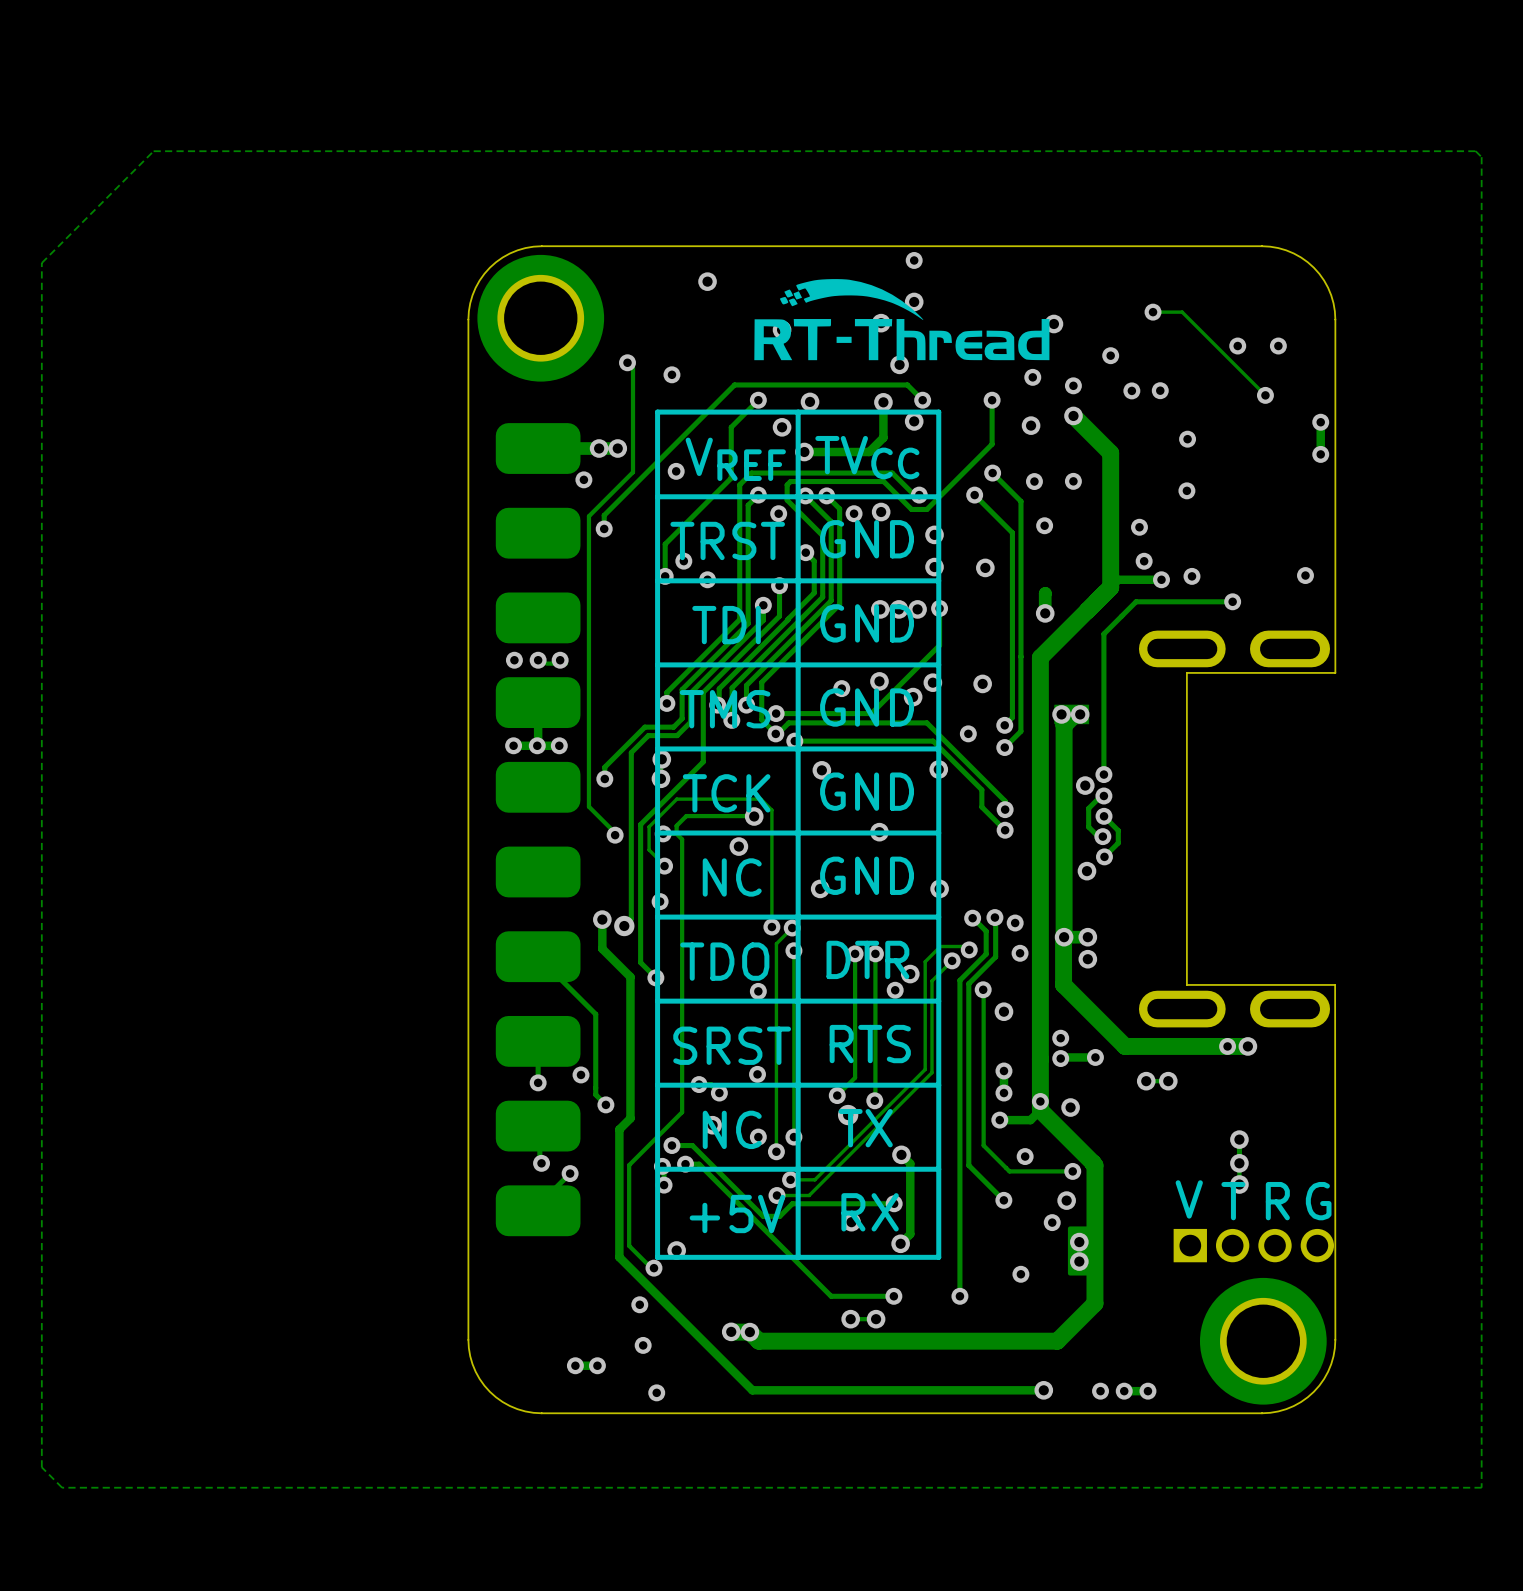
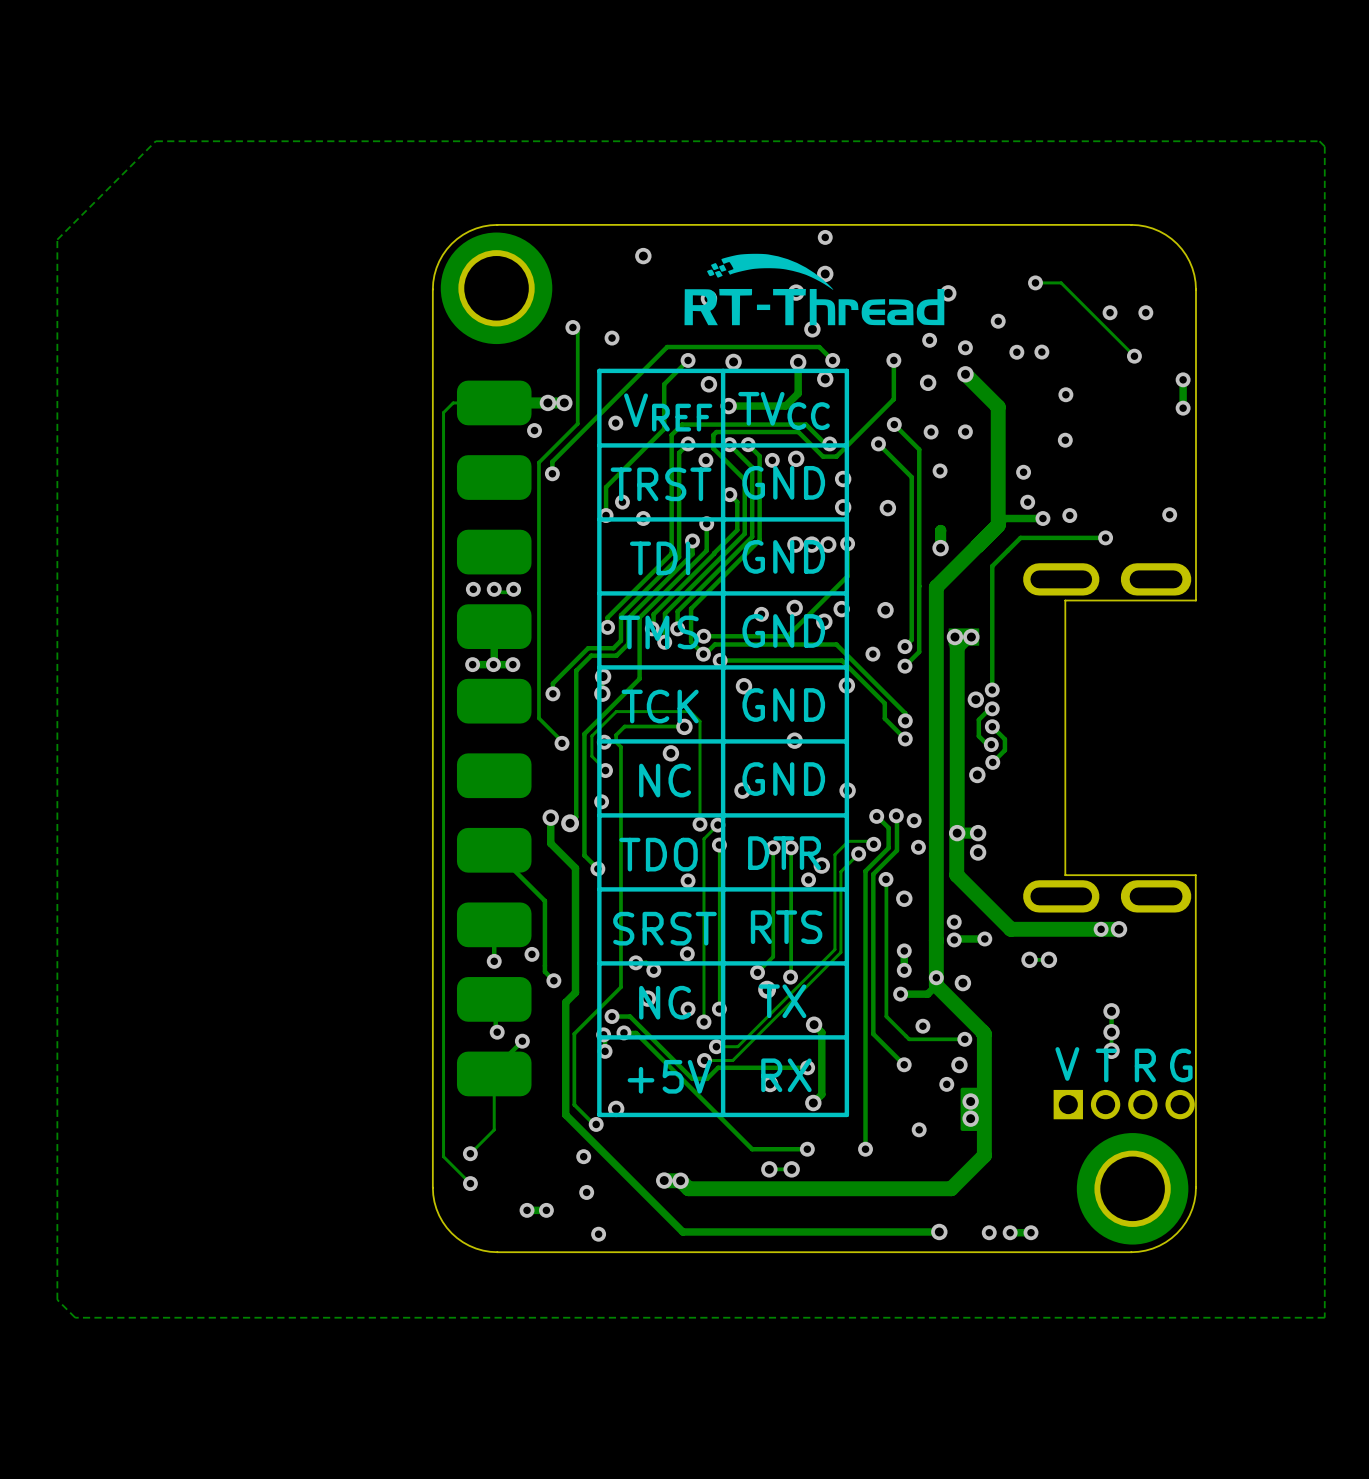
track: none -> (494, 402) (453, 402) (443, 412) (443, 1156) (470, 1183)
track: none -> (494, 1073) (494, 1129) (470, 1153)
via: none -> (470, 1153)
via: none -> (470, 1183)

